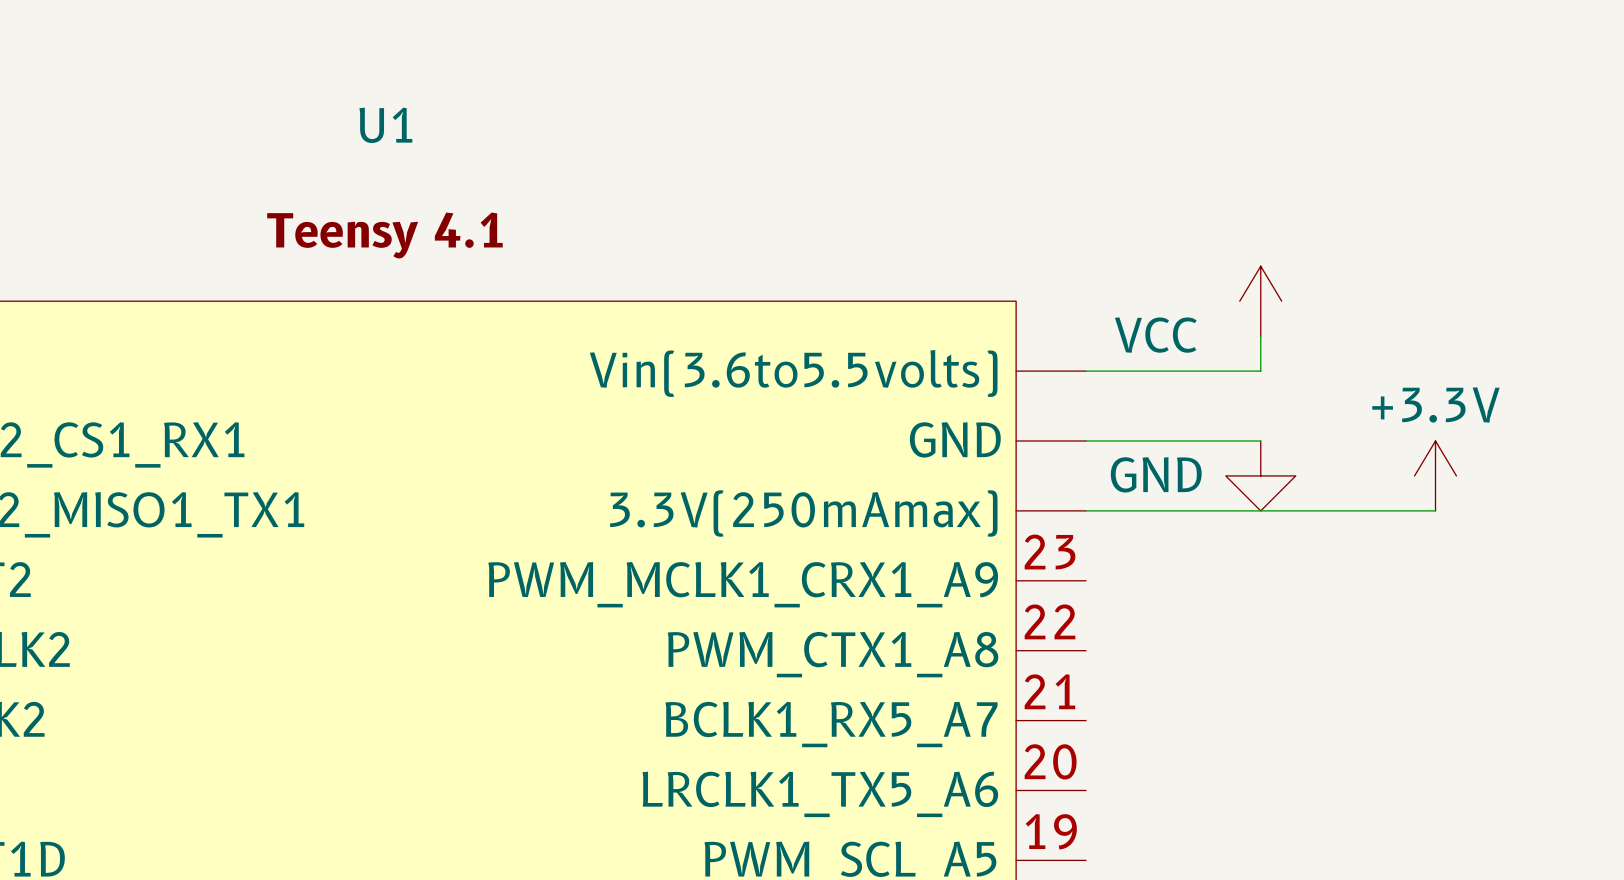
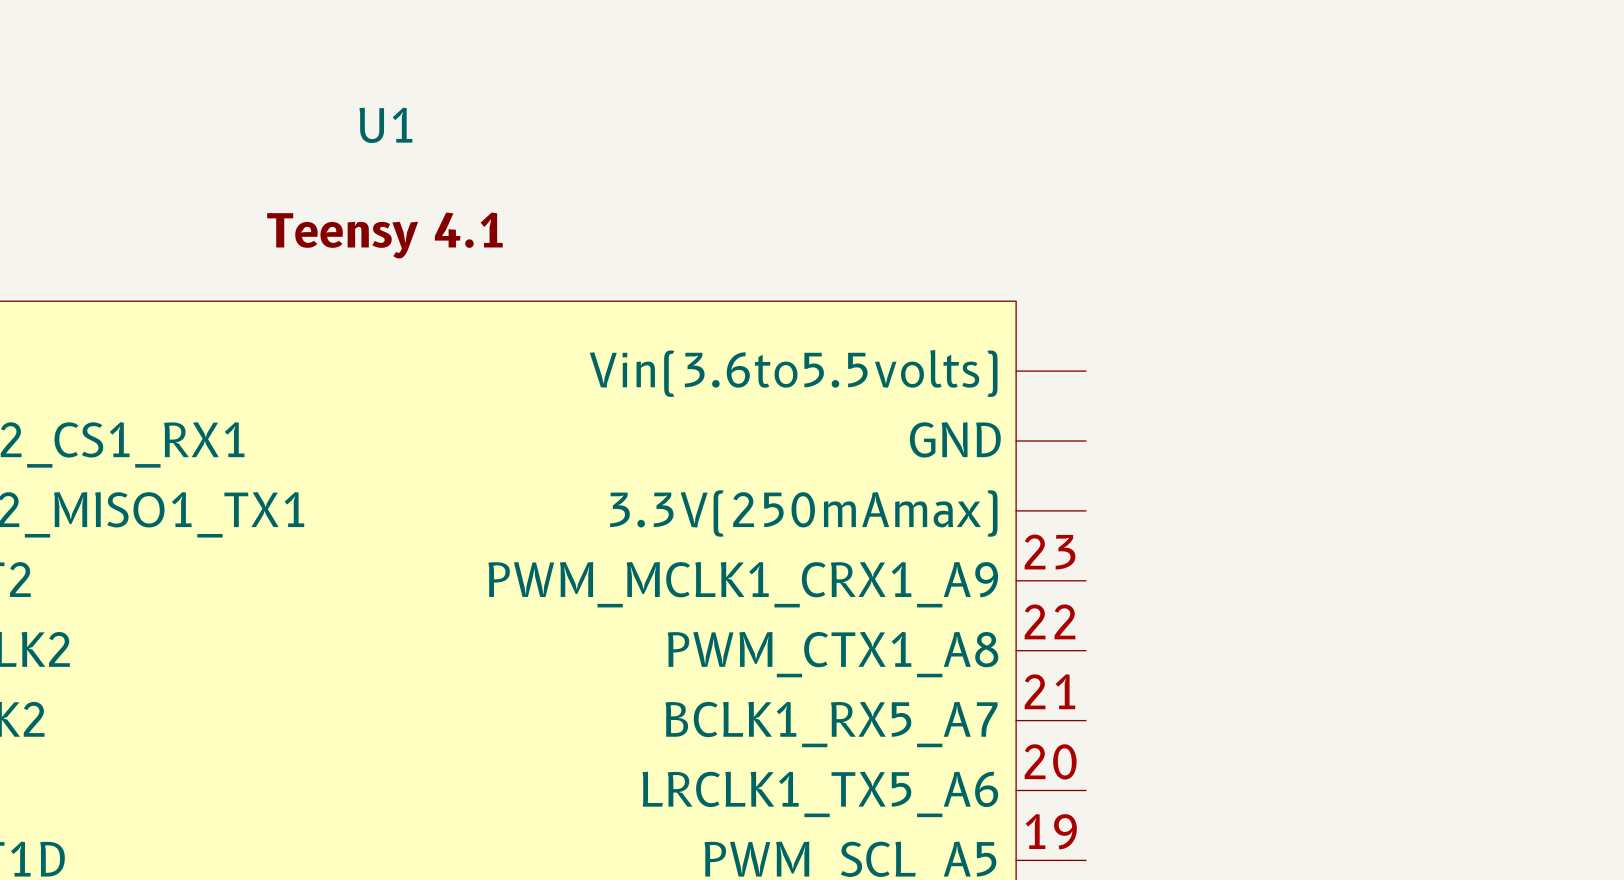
power symbol: VCC (1260, 301) -> none
wire: (1260, 336) (1260, 371) (1086, 371) -> none
wire: (1086, 441) (1260, 441) -> none
power symbol: GND (1260, 475) -> none
power symbol: +3.3V (1435, 475) -> none
wire: (1086, 510) (1435, 510) -> none

